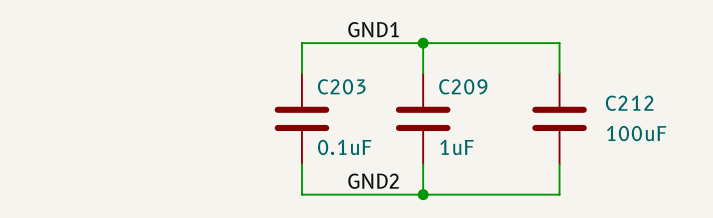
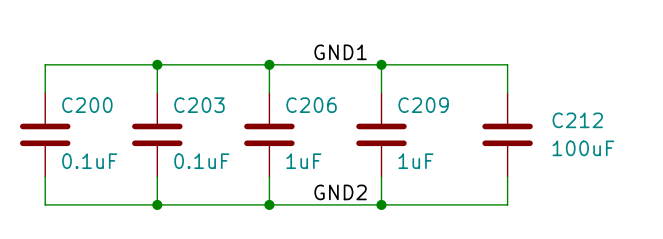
wire: none -> (157, 64) (157, 92)
junction: none -> (157, 64)
wire: none -> (269, 64) (45, 64) (45, 92)
junction: none -> (269, 64)
C203 name: C203 (341, 86) -> C206 (311, 105)
C200: none -> 0.1uF (45, 134)
C203: none -> 0.1uF (157, 134)
C203 value: 0.1uF (344, 147) -> 1uF (303, 161)
wire: none -> (45, 176) (45, 204) (269, 204)
wire: none -> (157, 176) (157, 204)
junction: none -> (157, 204)
junction: none -> (269, 204)

